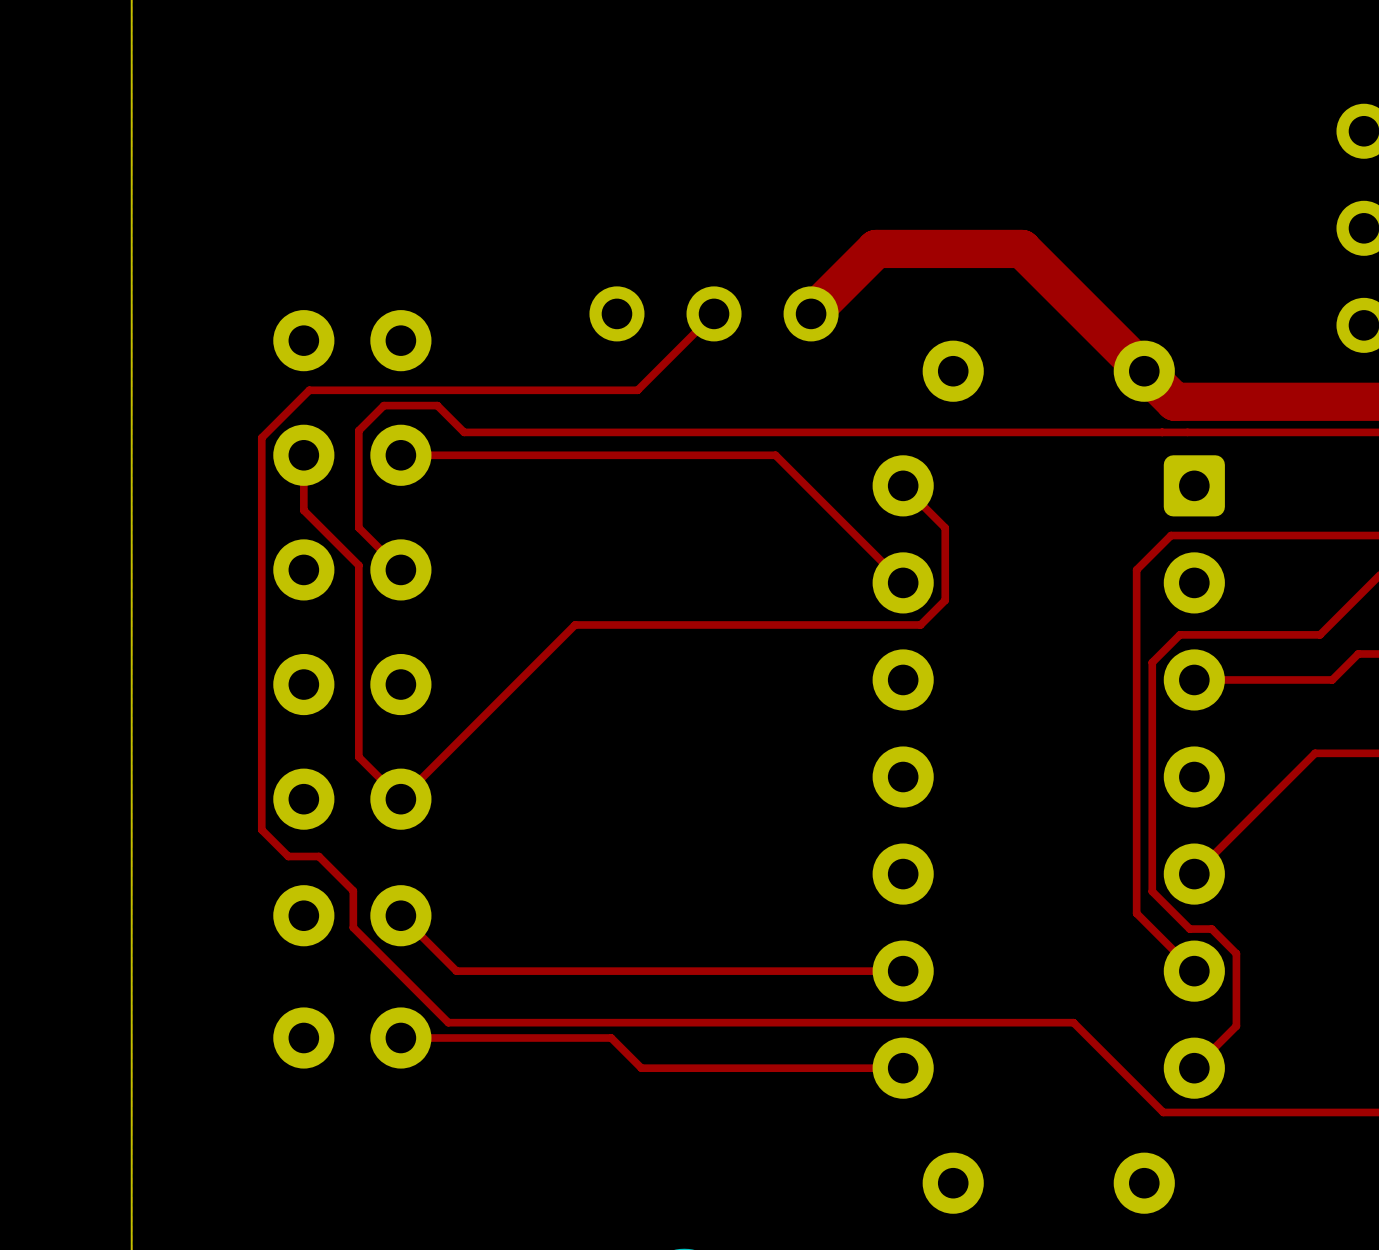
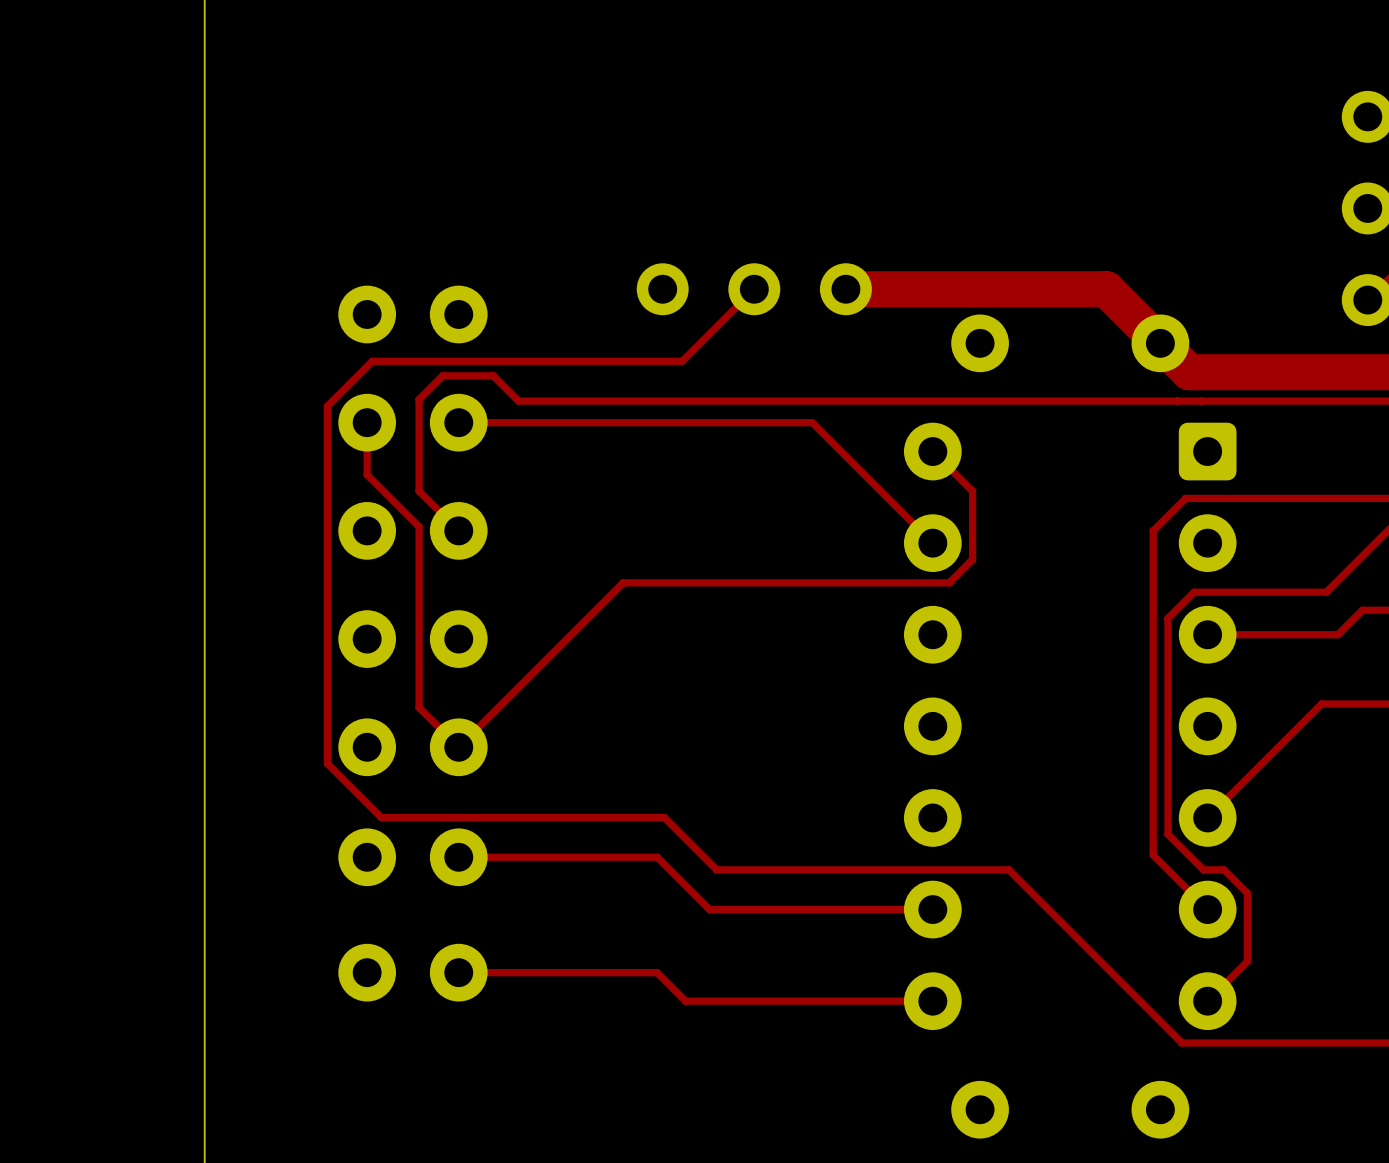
track: (811, 313) (876, 248) (1022, 248) (1086, 313) -> (845, 289) (1106, 289)
track: (261, 816) (261, 829) (288, 856) (318, 856) (353, 890) (353, 927) (448, 1022) (1073, 1022) (1163, 1112) (1167, 1112) -> (327, 763) (381, 817) (664, 817) (716, 869) (1008, 869) (1182, 1042)
track: (401, 915) (456, 971) (666, 971) -> (458, 857) (657, 857) (709, 909)

